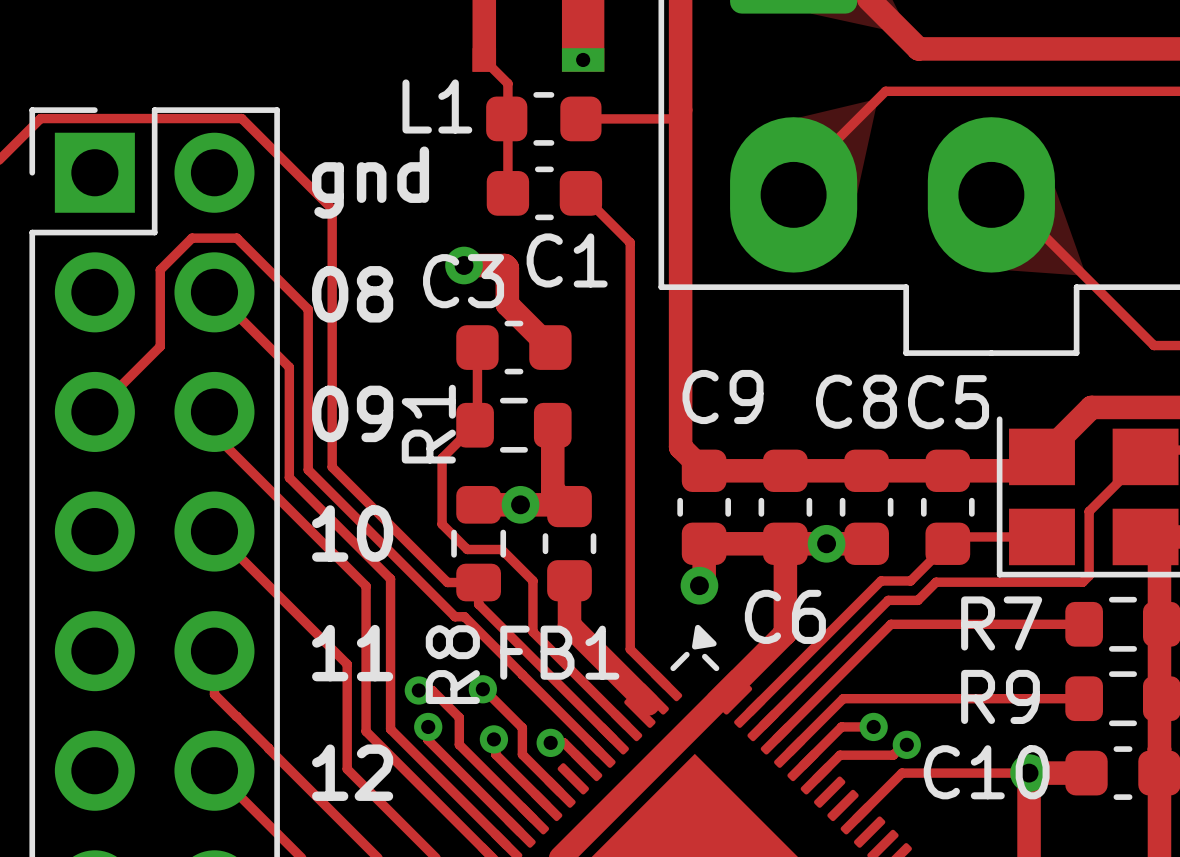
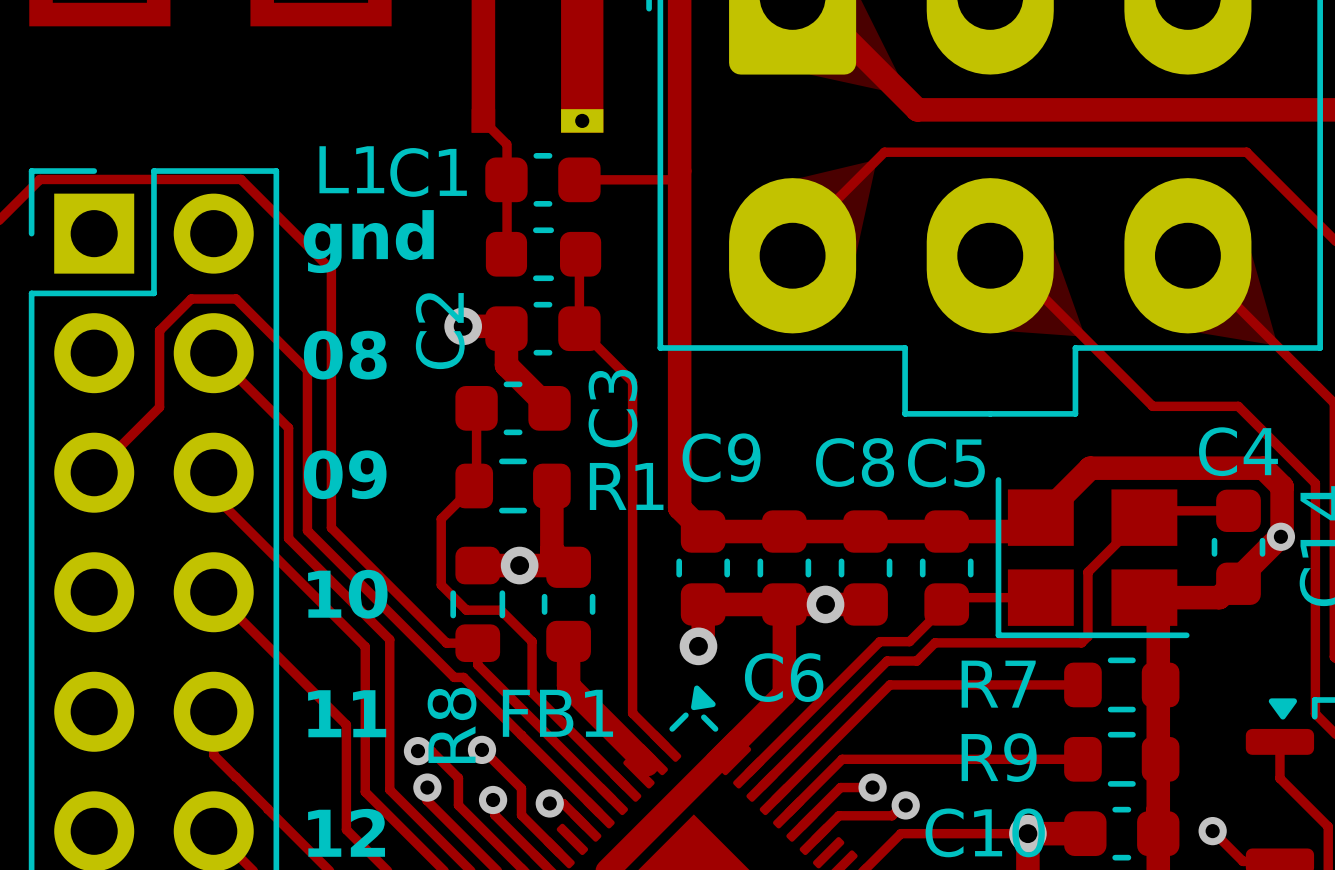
L1 name position: L1 (437, 106) -> L1 (351, 169)
L1 position: (543, 118) -> (543, 254)
C1 position: (544, 193) -> (542, 179)
track: (580, 193) (630, 242) (630, 649) (633, 652) -> (580, 254) (579, 328) (632, 381) (632, 713)
C1 name position: C1 (567, 260) -> C1 (428, 172)
C2: none -> (542, 328)
C3 name rotation: 0° (463, 281) -> 90° counterclockwise (612, 408)
C3 name position: C3 (463, 281) -> C3 (612, 408)
R1 name rotation: 0° (428, 424) -> 90° clockwise (626, 486)
R1 name position: R1 (428, 424) -> R1 (626, 486)

